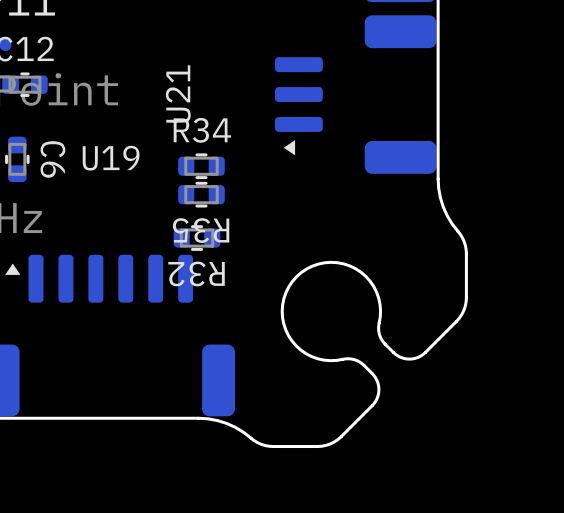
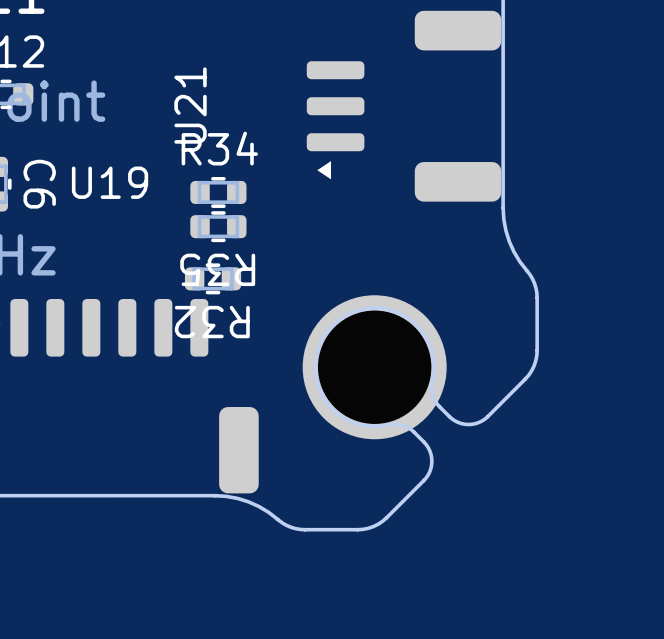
part: none -> (374, 367)

